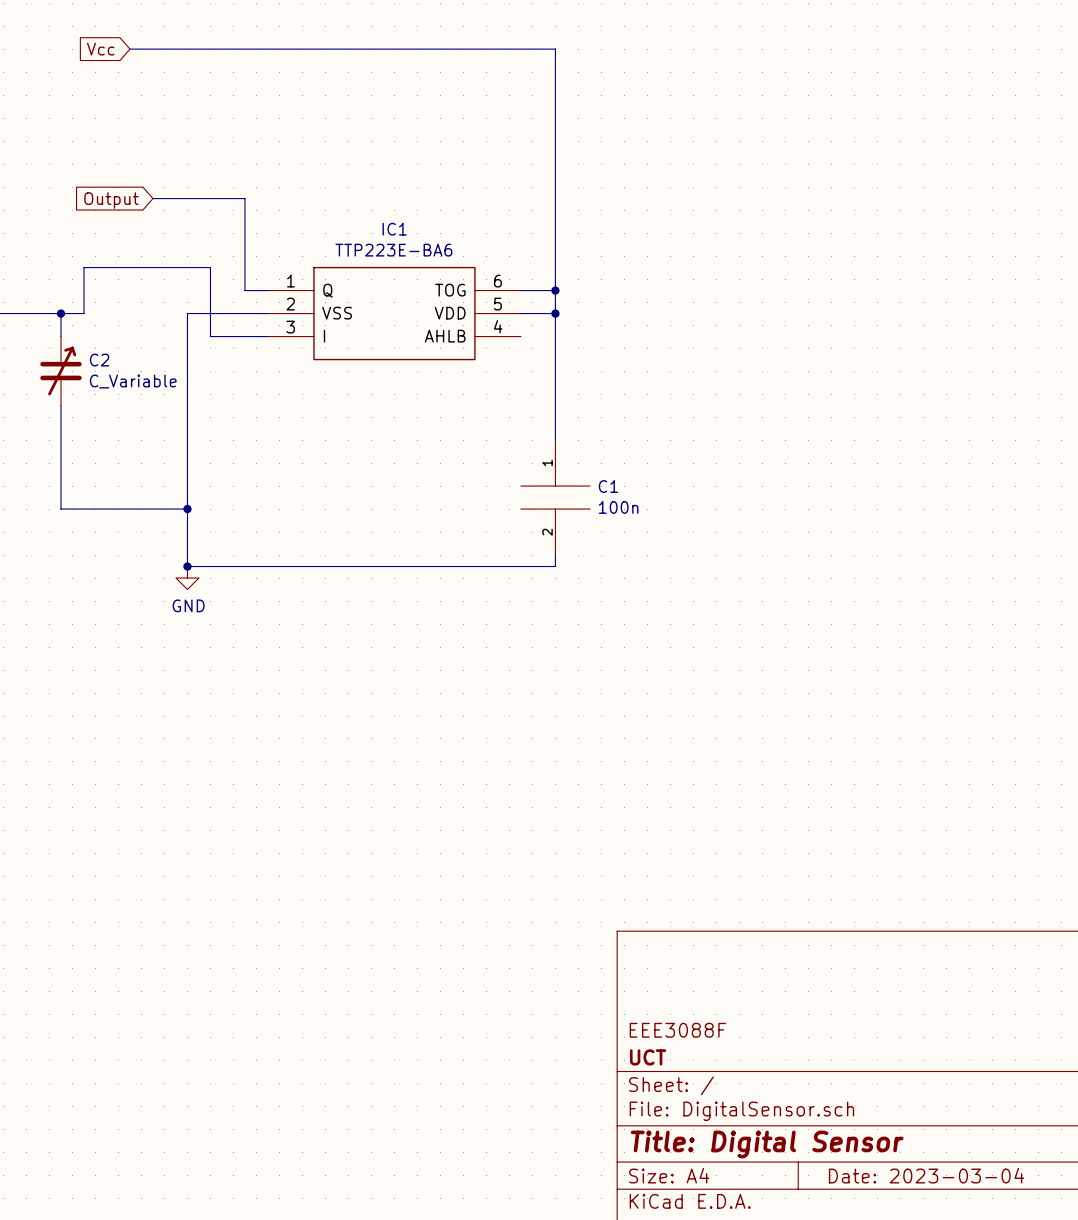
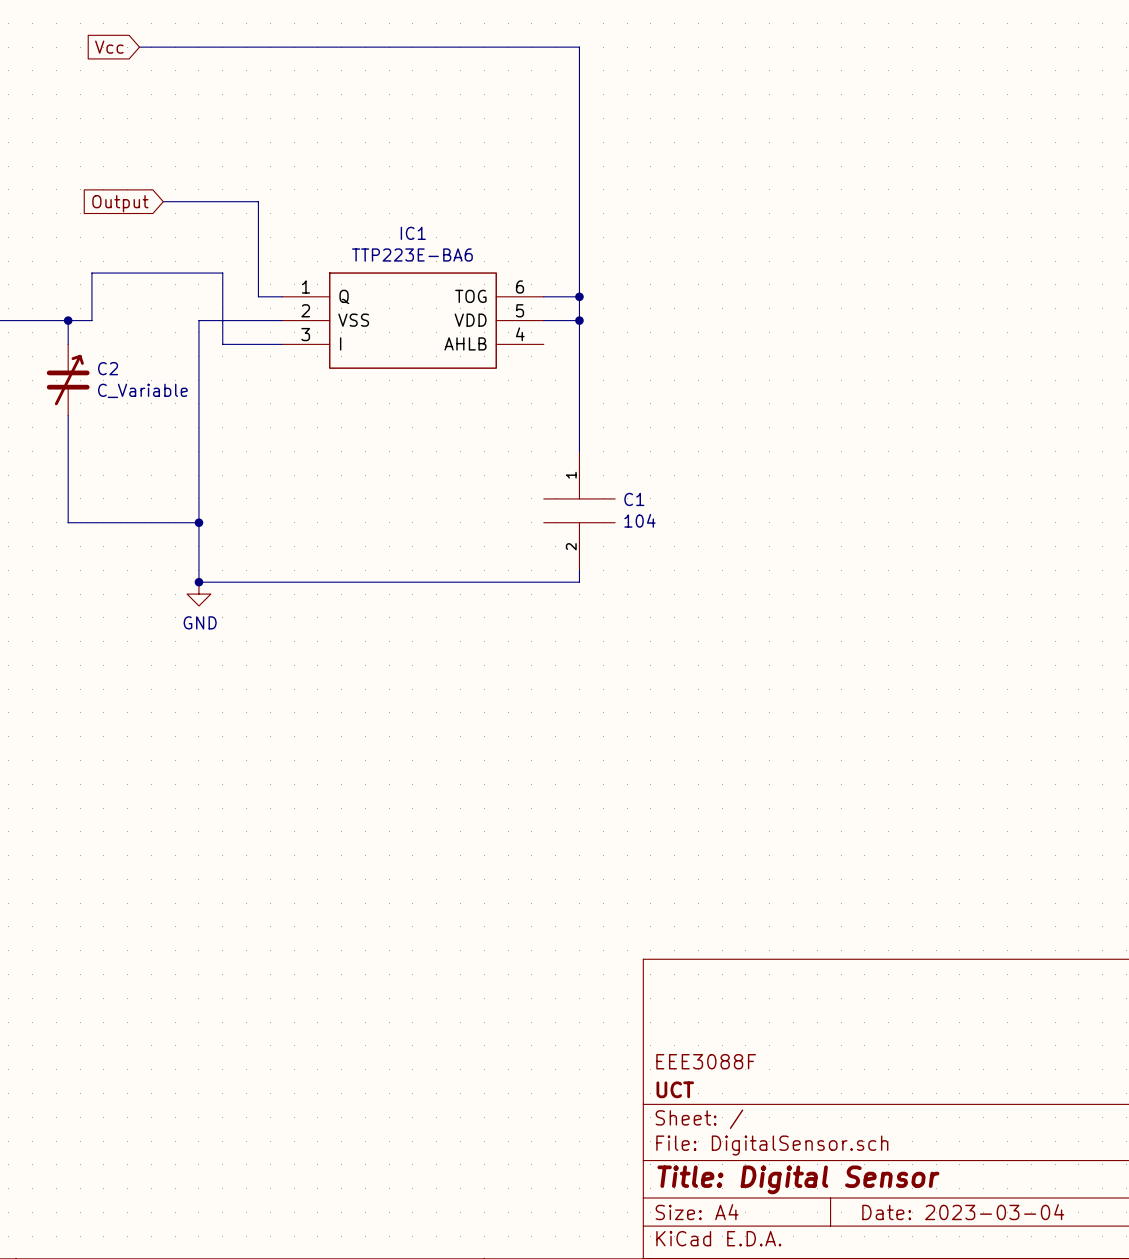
C1 value: 100n (618, 507) -> 104 (639, 520)

